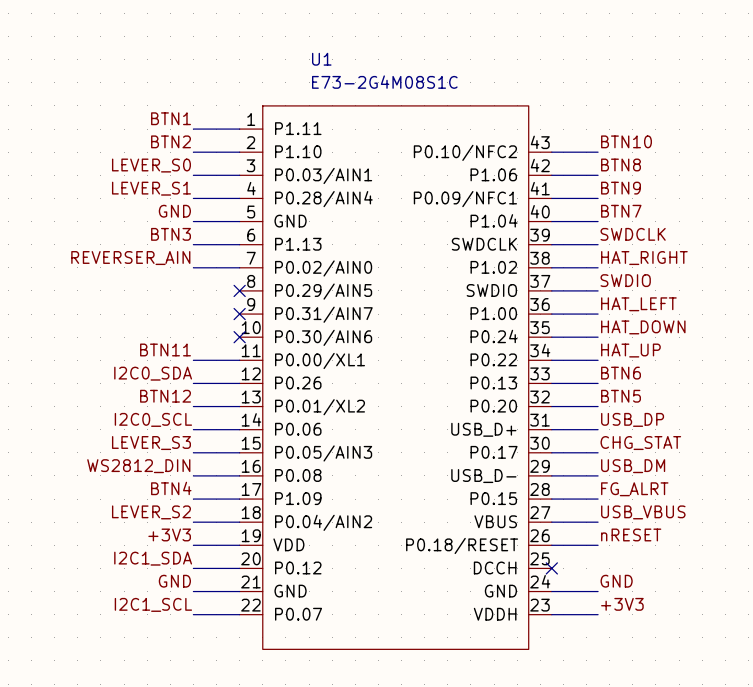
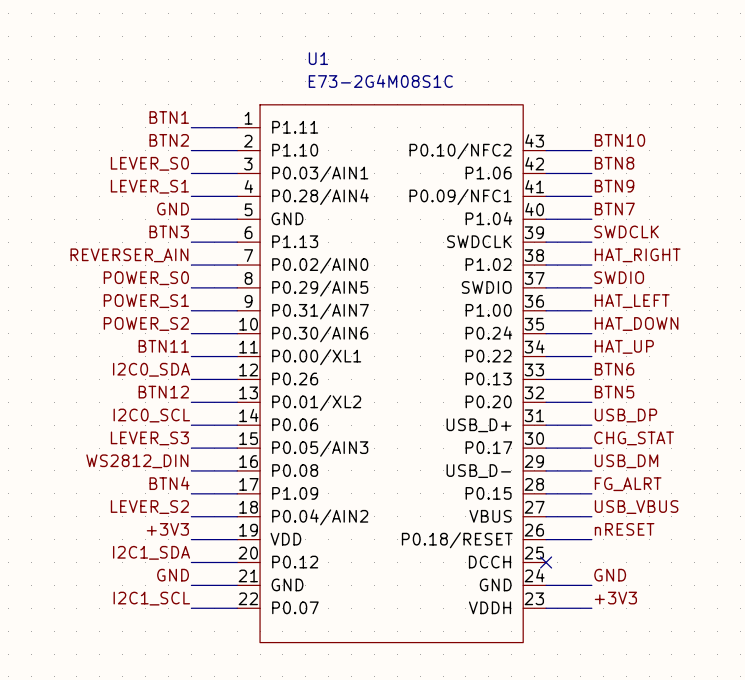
label: none -> POWER_S0 (146, 278)
wire: none -> (191, 287) (237, 287)
no-connect mark: (239, 290) -> none
label: none -> POWER_S1 (146, 301)
wire: none -> (191, 310) (237, 310)
no-connect mark: (239, 314) -> none
label: none -> POWER_S2 (146, 323)
wire: none -> (191, 333) (237, 333)
no-connect mark: (239, 337) -> none

